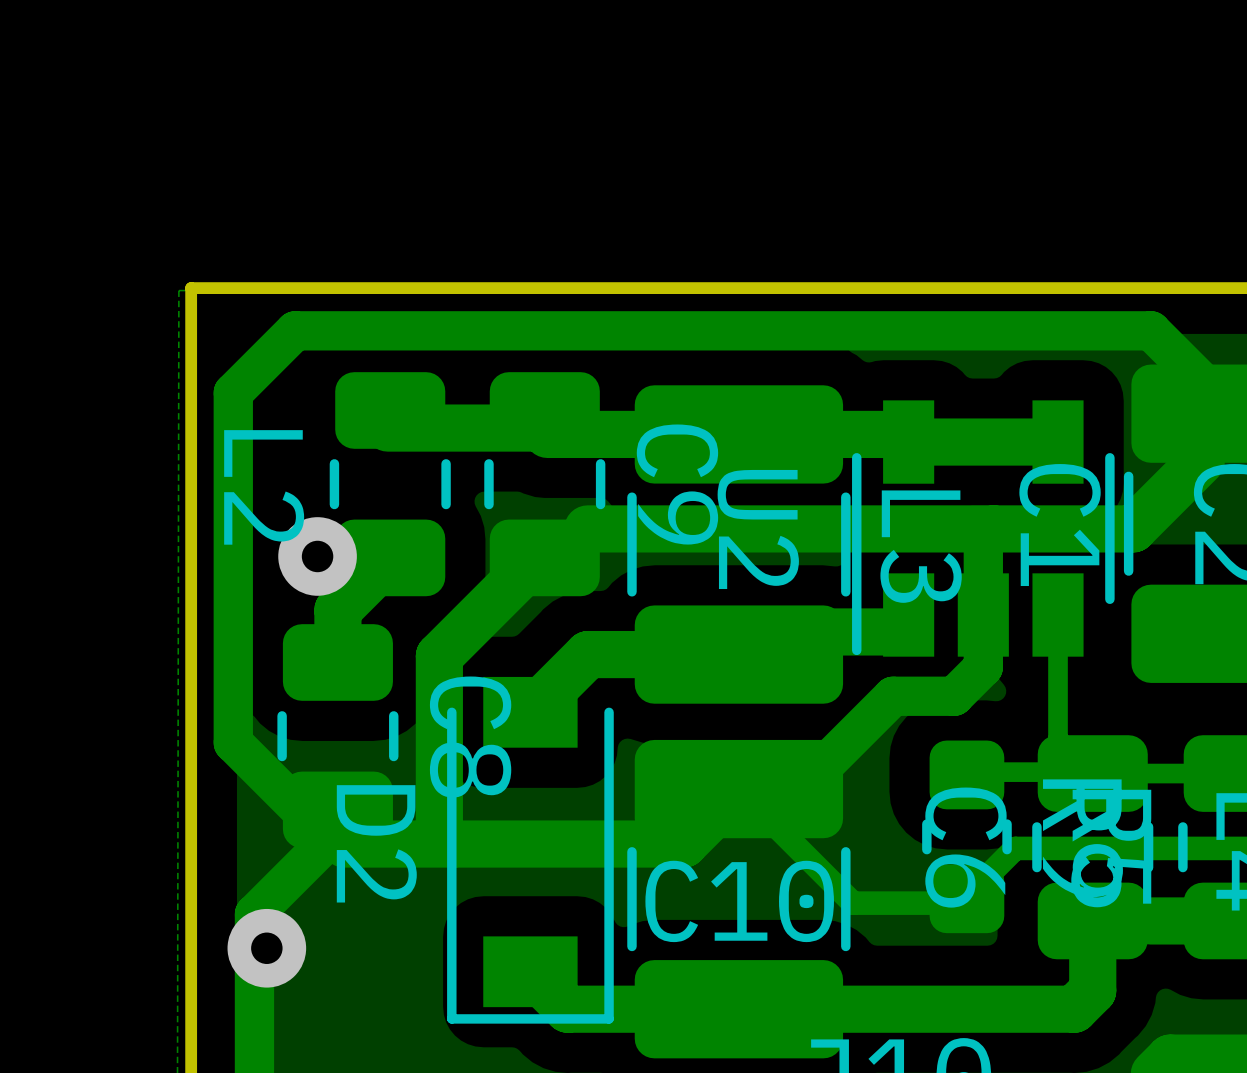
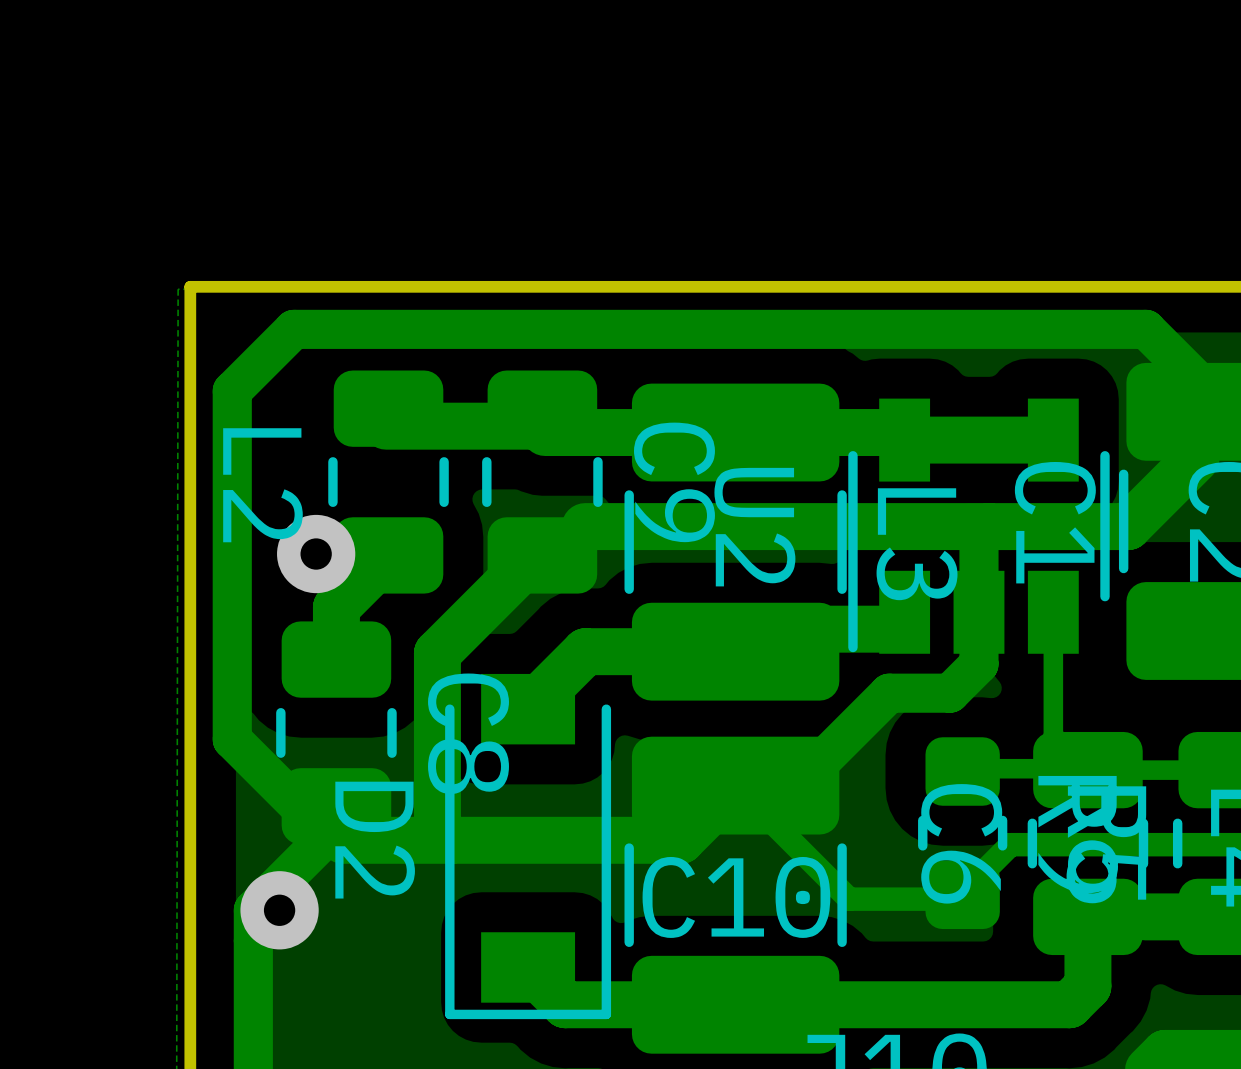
via position: (266, 948) -> (279, 910)

